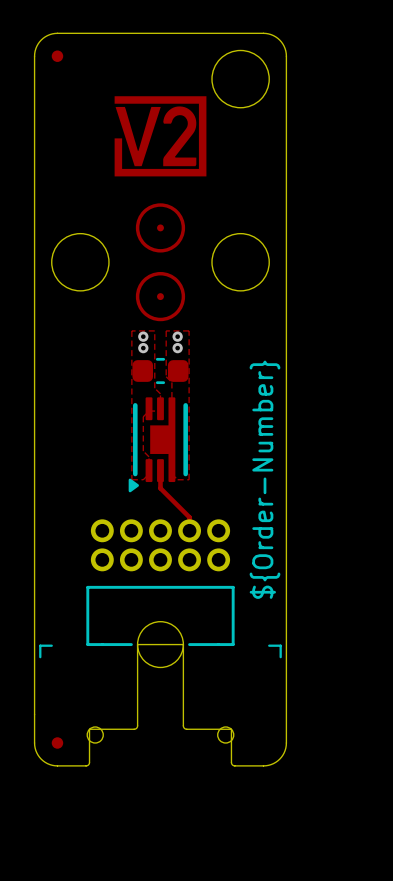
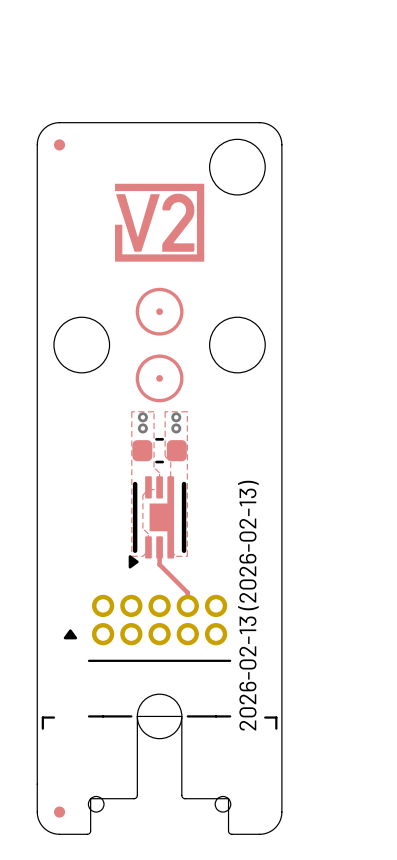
drawing: none -> [238, 480, 259, 731]
drawing: [249, 360, 281, 599] -> none
part footprint: [86, 519, 235, 647] -> [63, 594, 232, 718]

